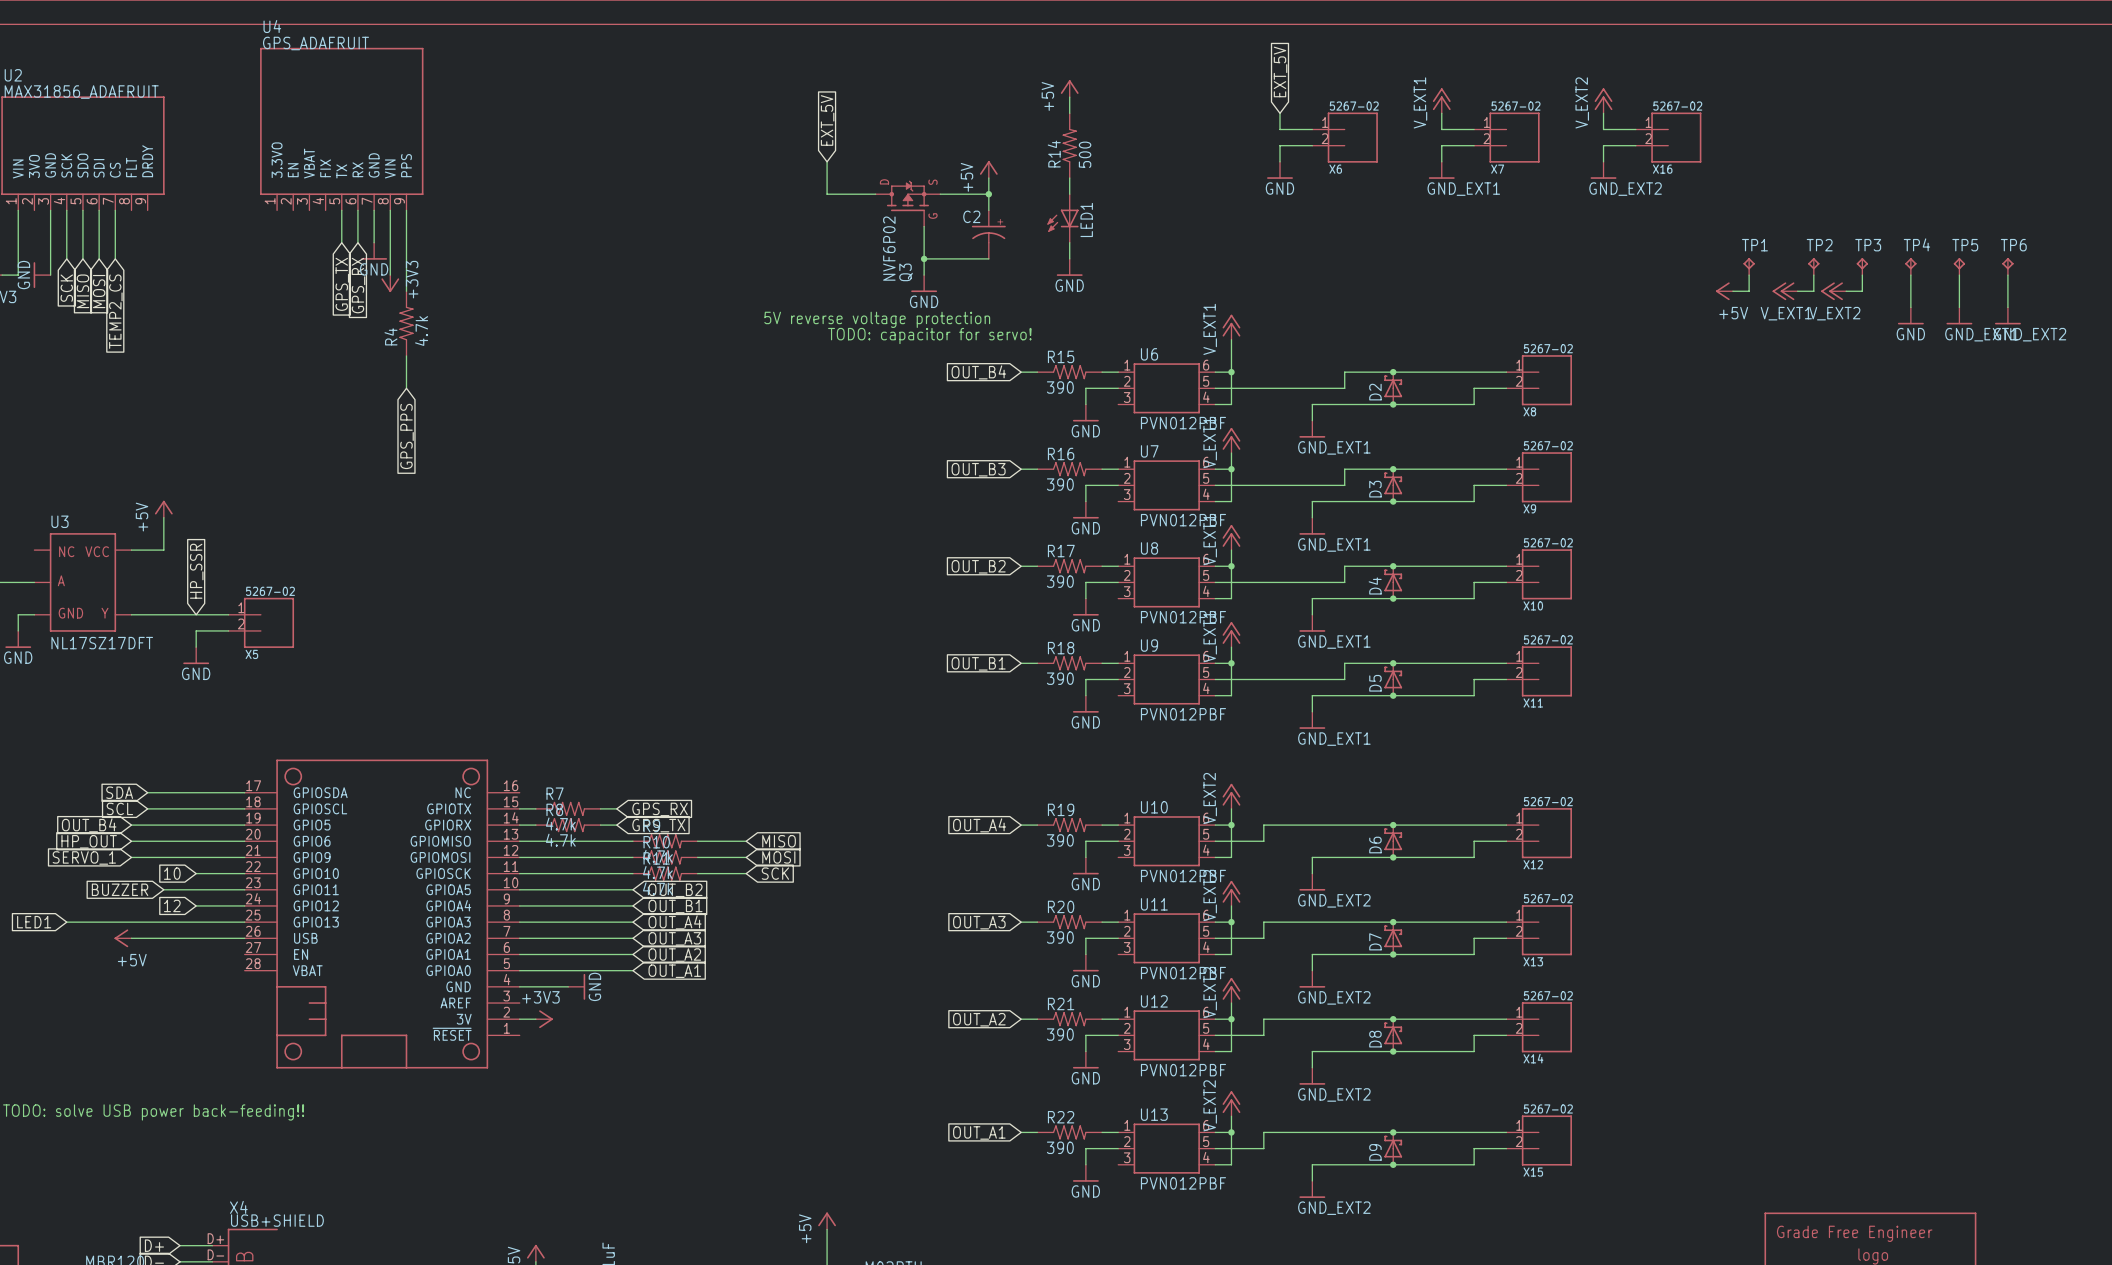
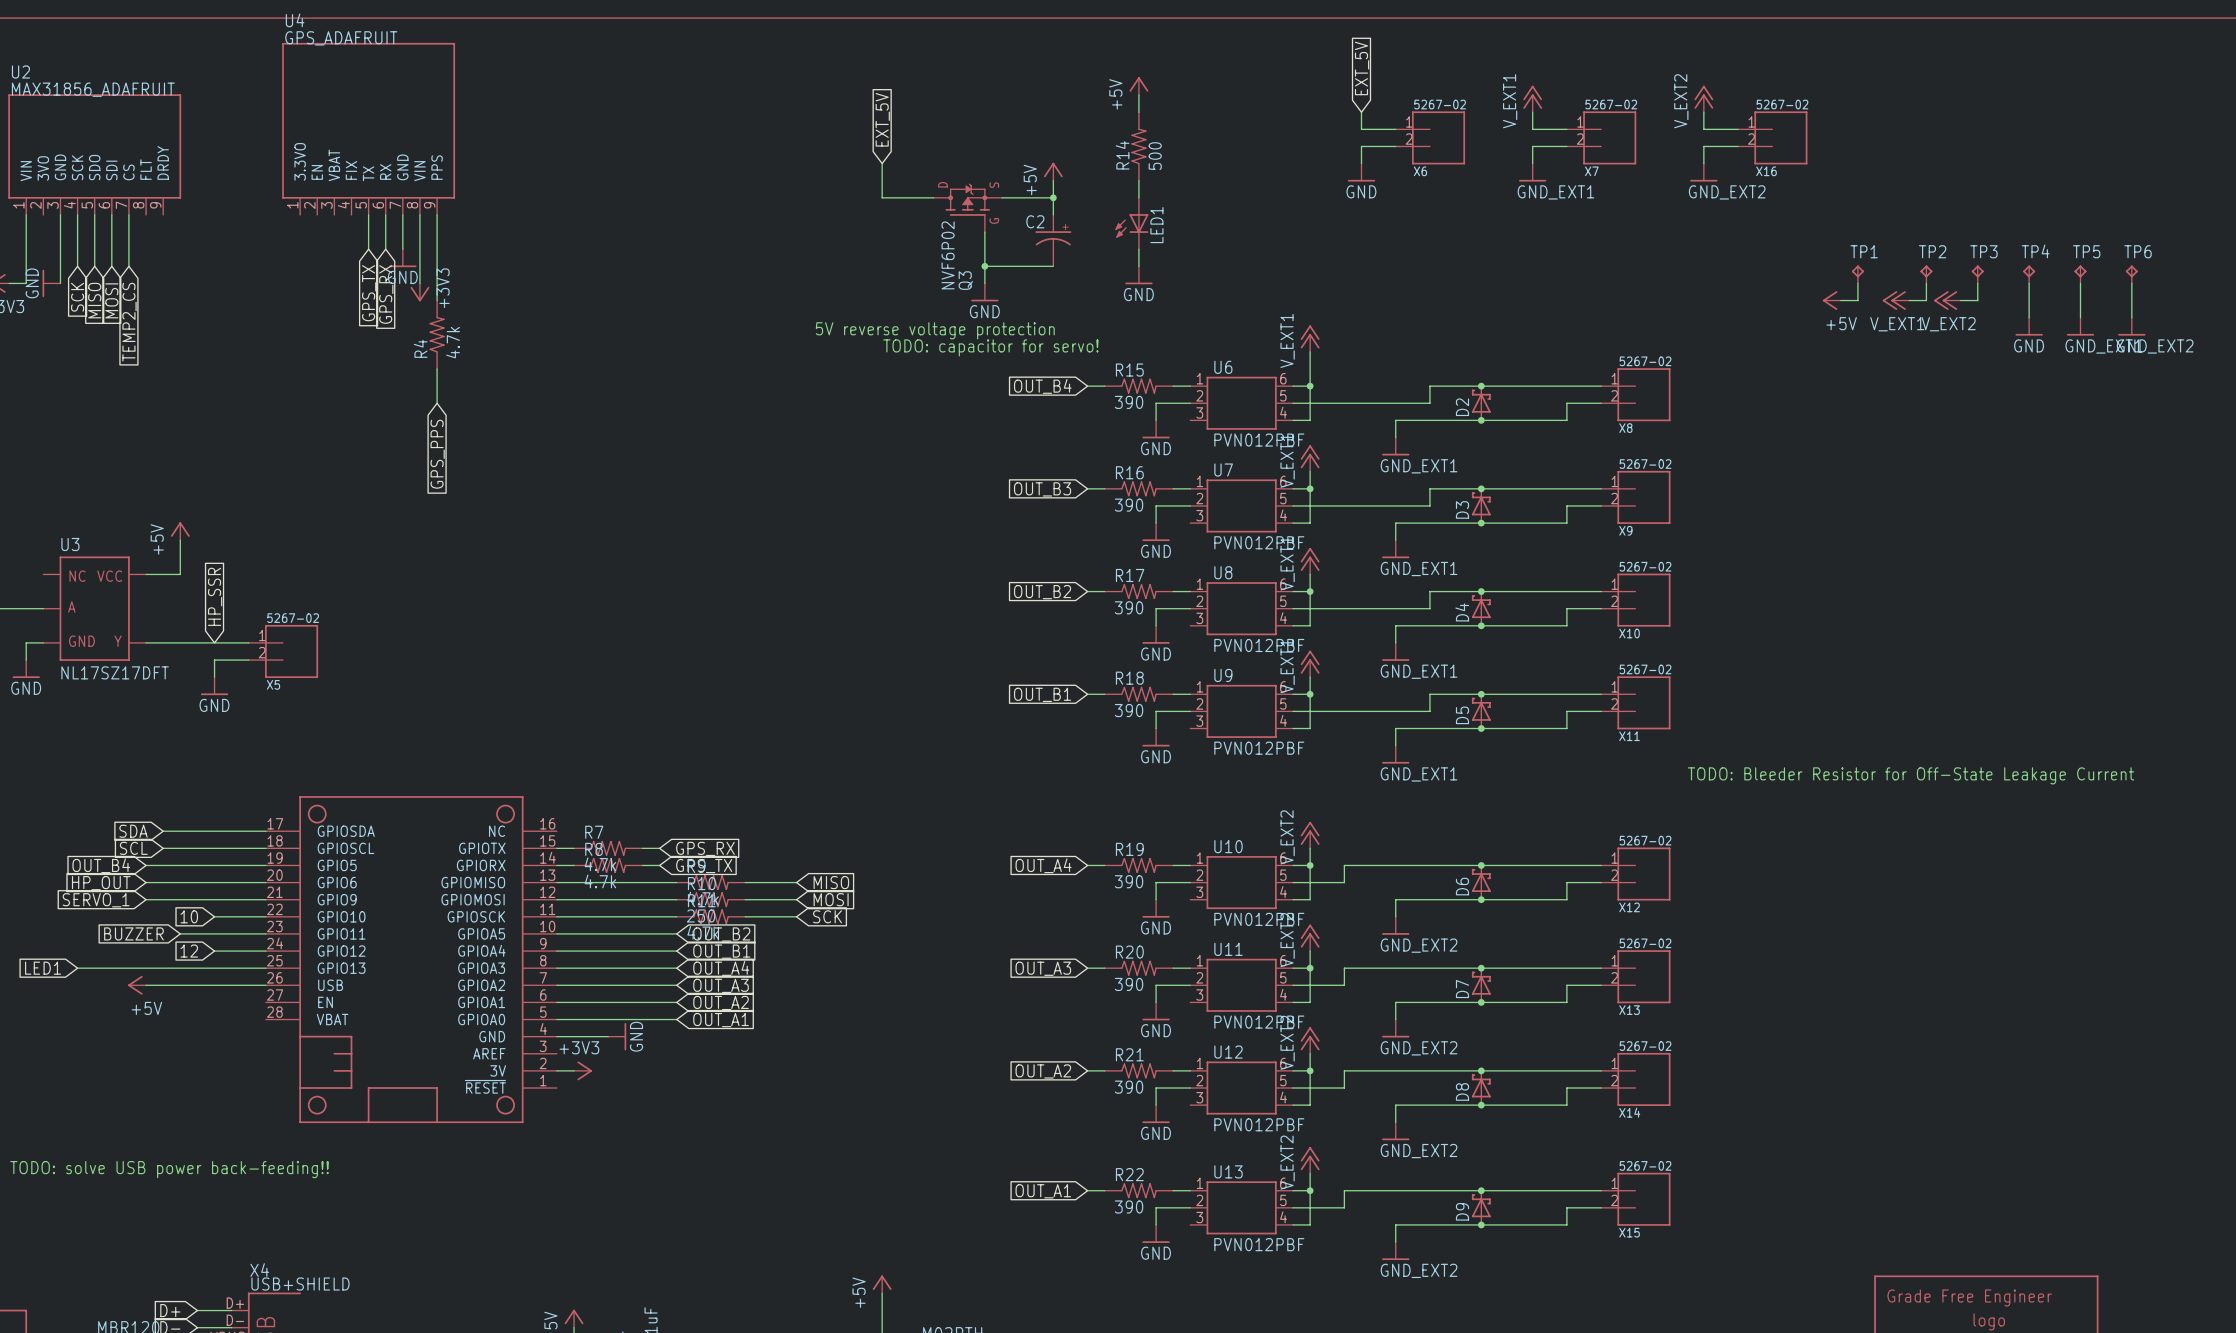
text: none -> TODO: Bleeder Resistor for Off-State Leakage Current (1911, 775)
R10 value: 4.7k (657, 872) -> 250 (701, 915)

